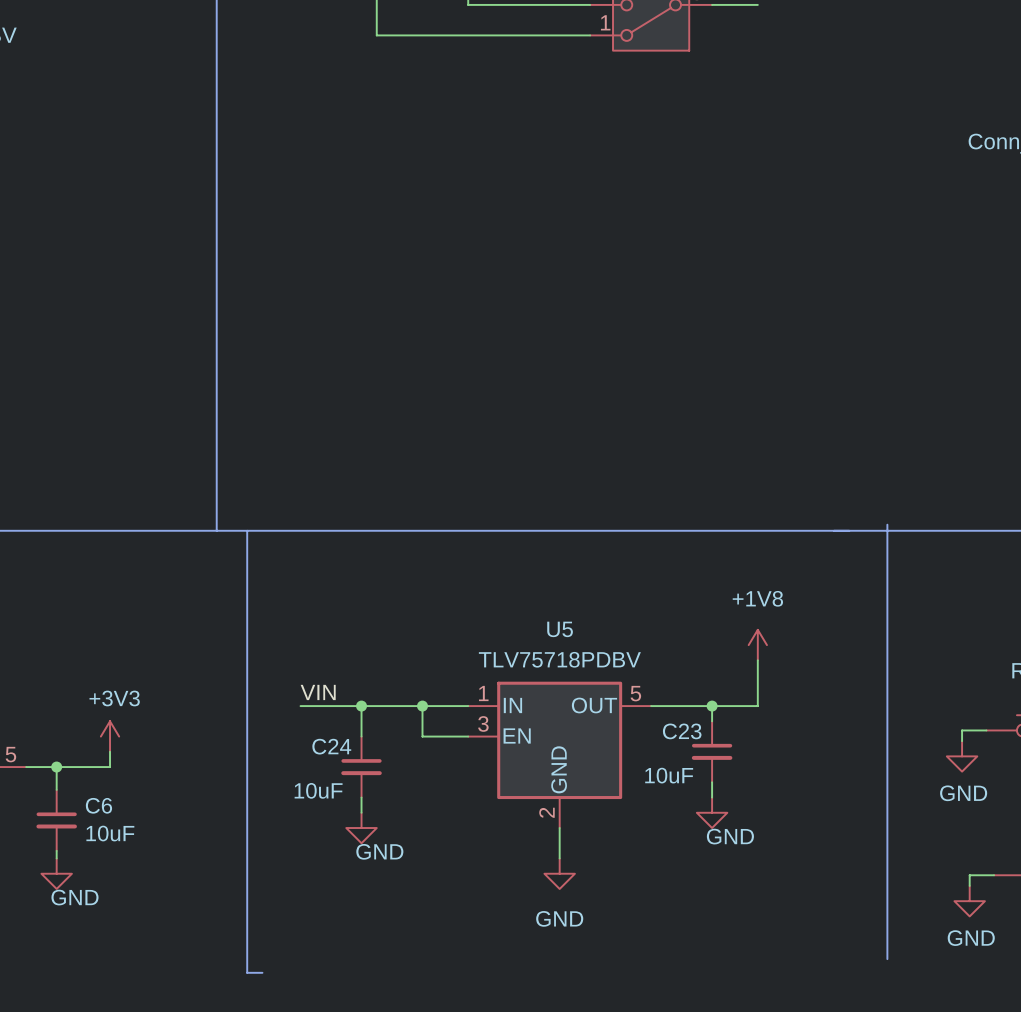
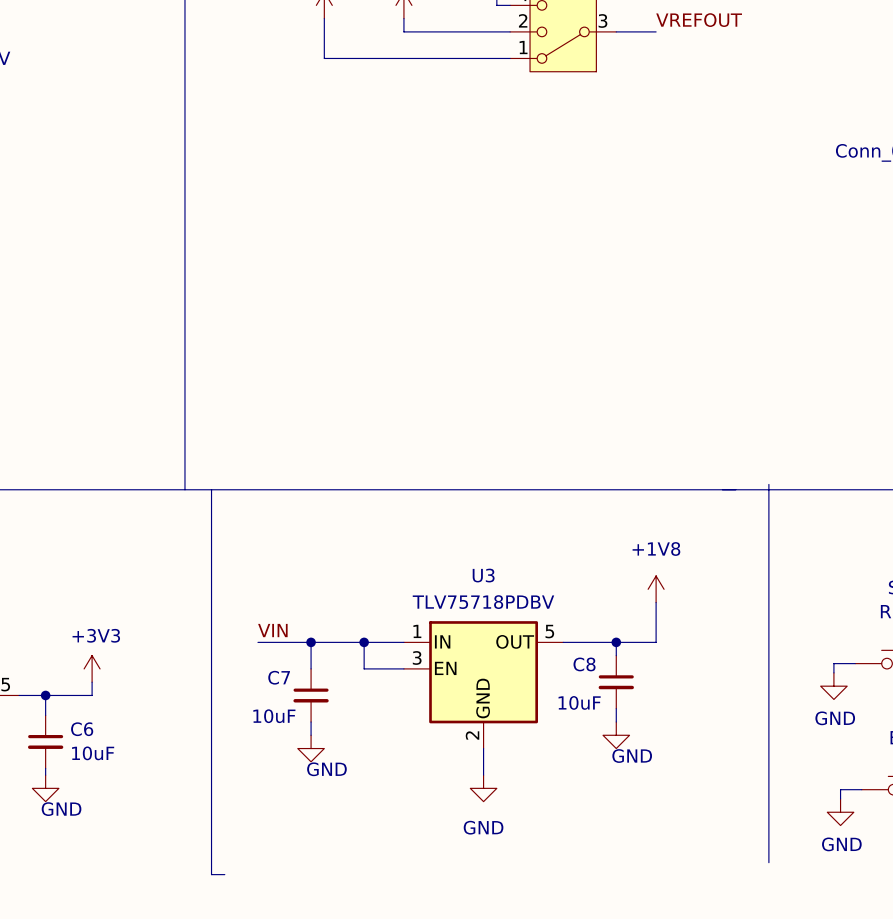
U5 name: U5 (560, 629) -> U3 (483, 575)
C23 name: C23 (682, 731) -> C8 (584, 664)
C24 name: C24 (331, 746) -> C7 (279, 677)

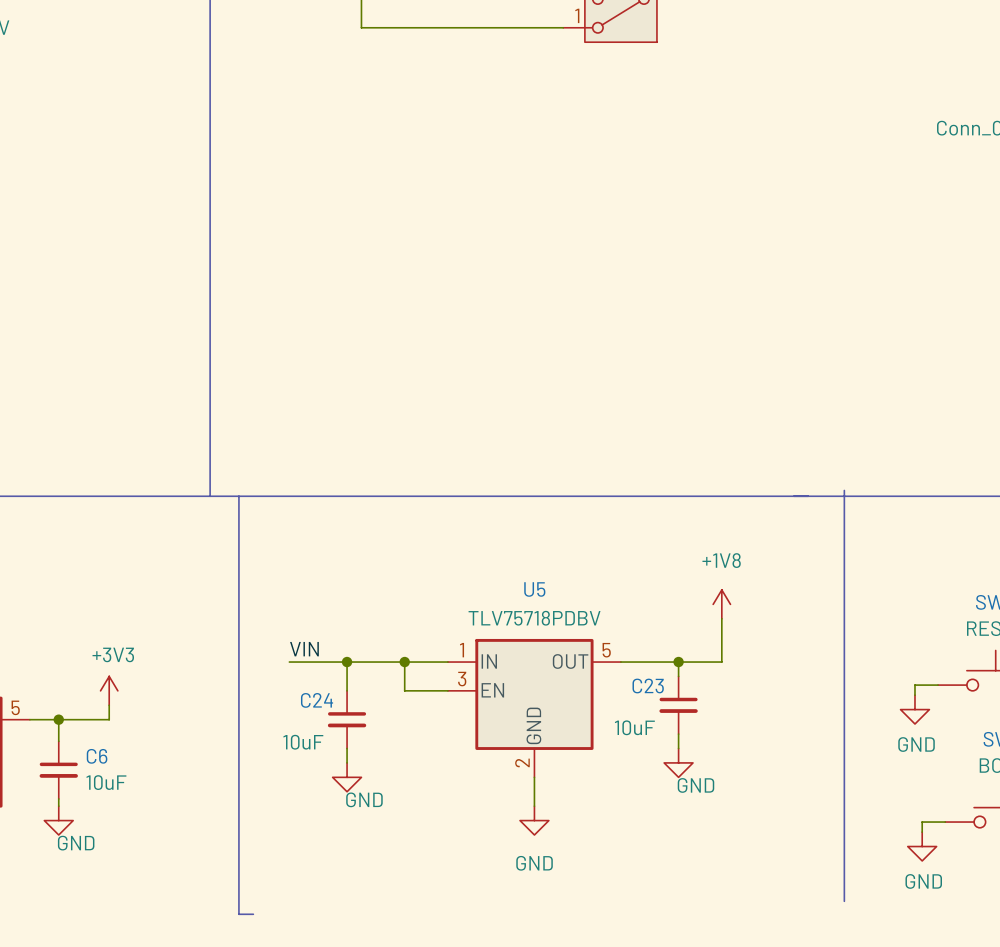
U3 name: U3 (483, 575) -> U5 (534, 589)
C8 name: C8 (584, 664) -> C23 (648, 686)
C7 name: C7 (279, 677) -> C24 (317, 700)

